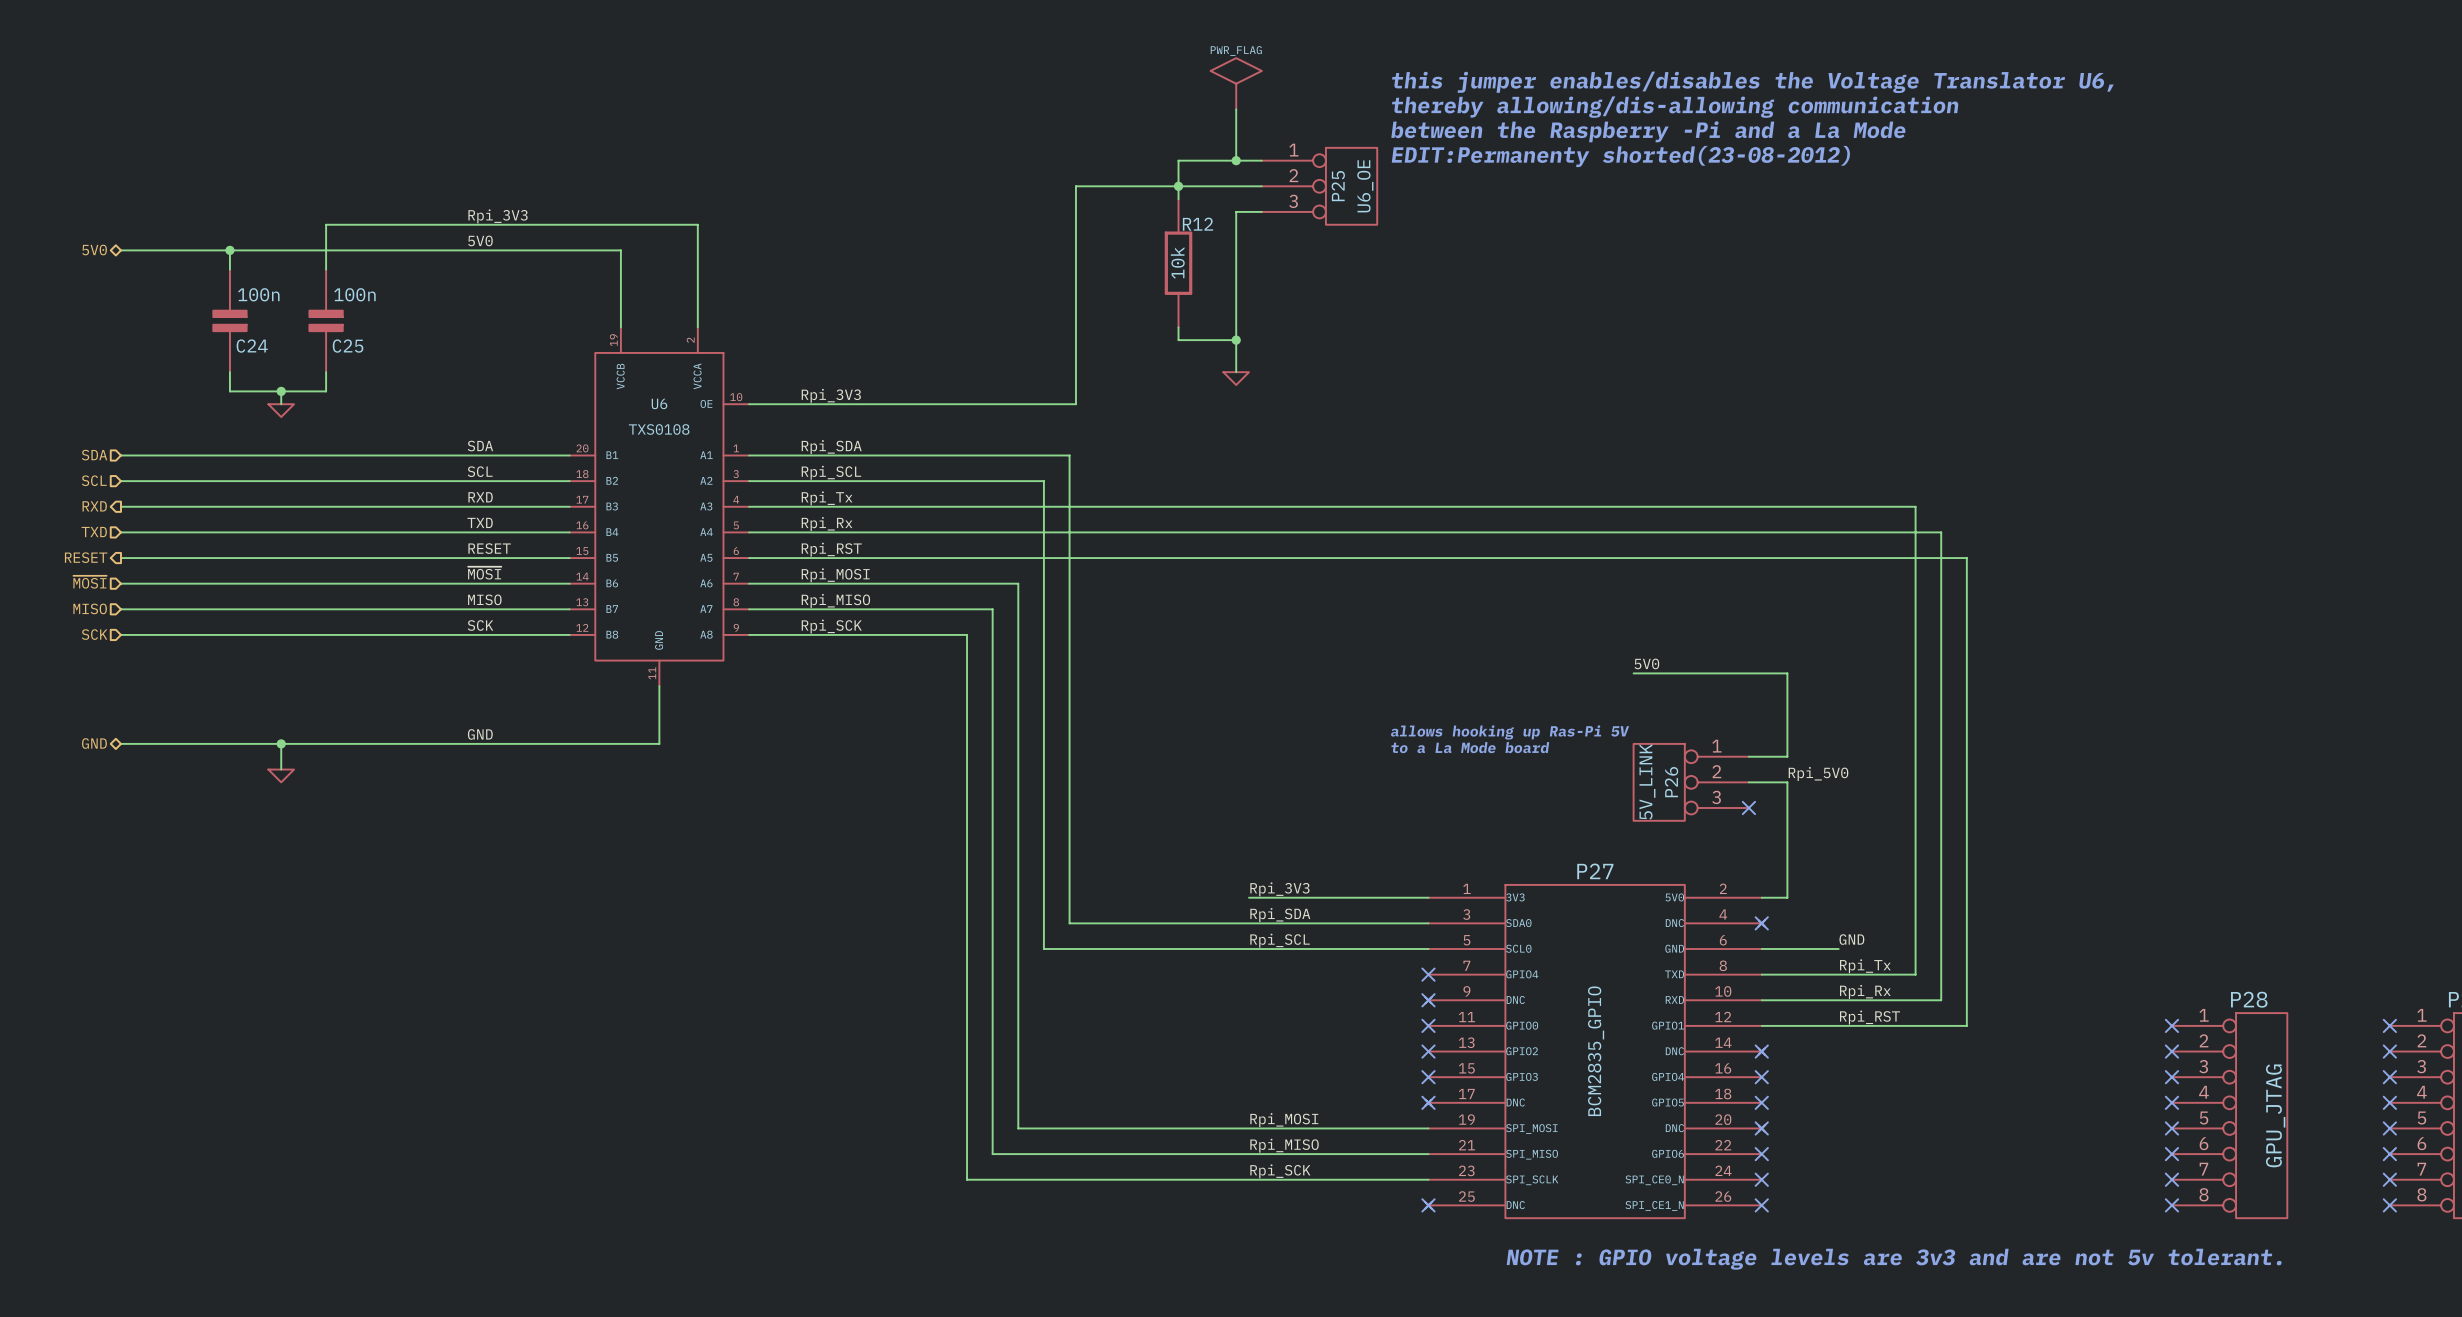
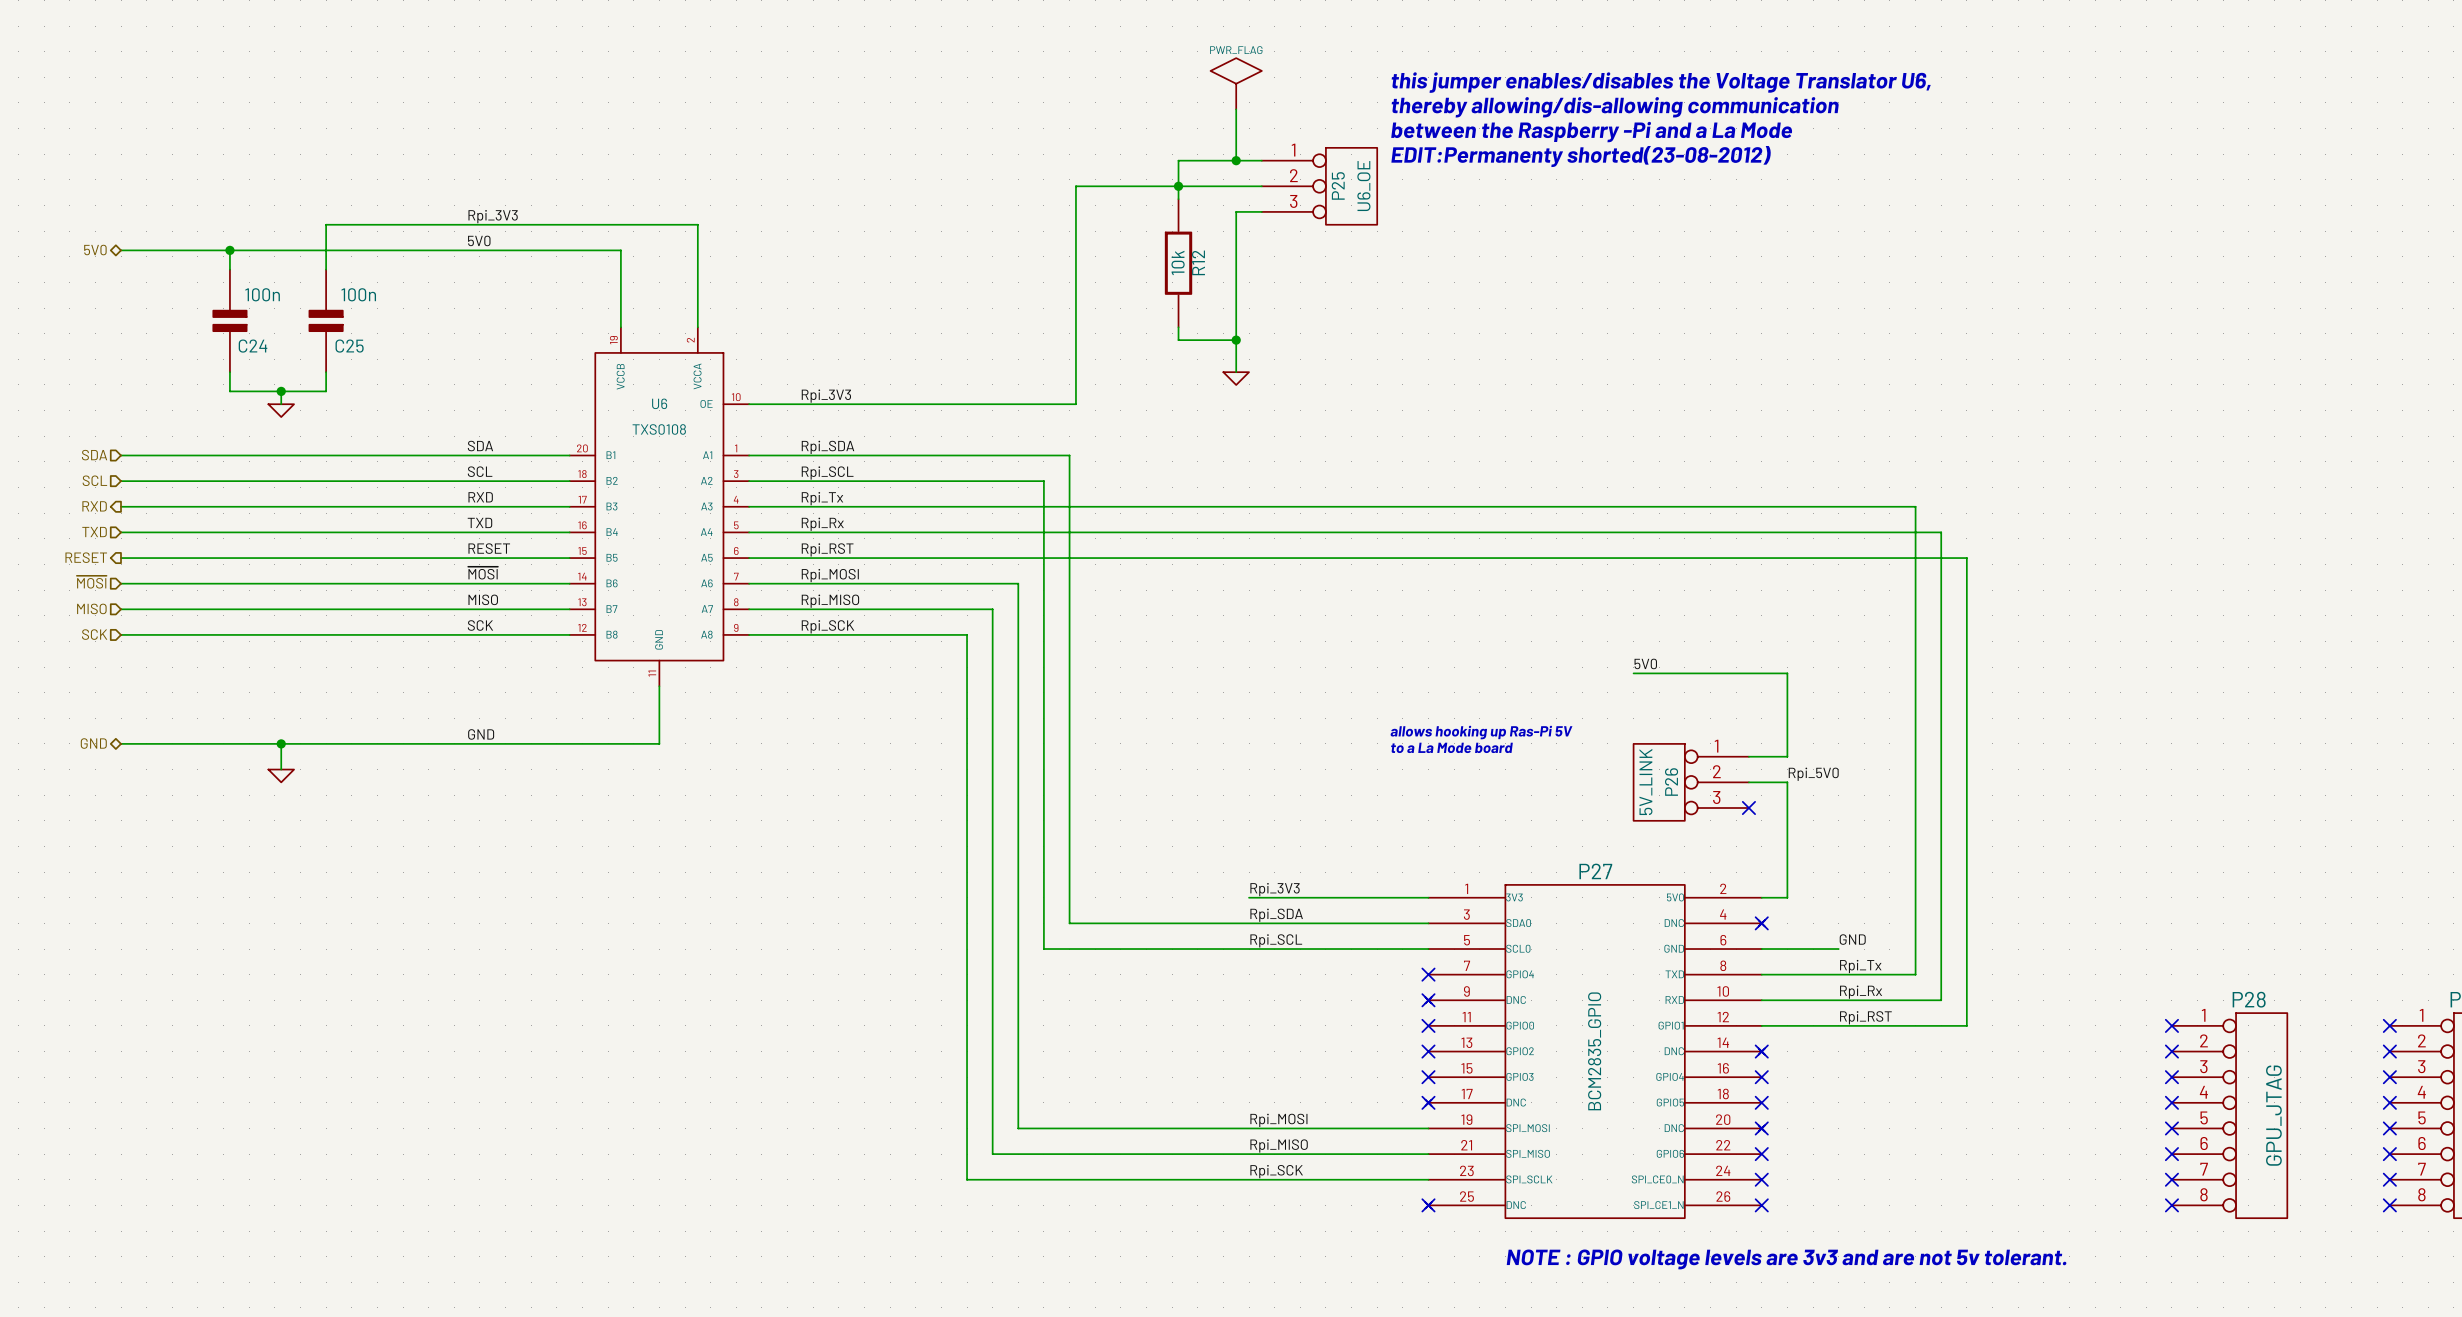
R12 name rotation: 0° (1198, 224) -> 90° counterclockwise (1198, 262)

